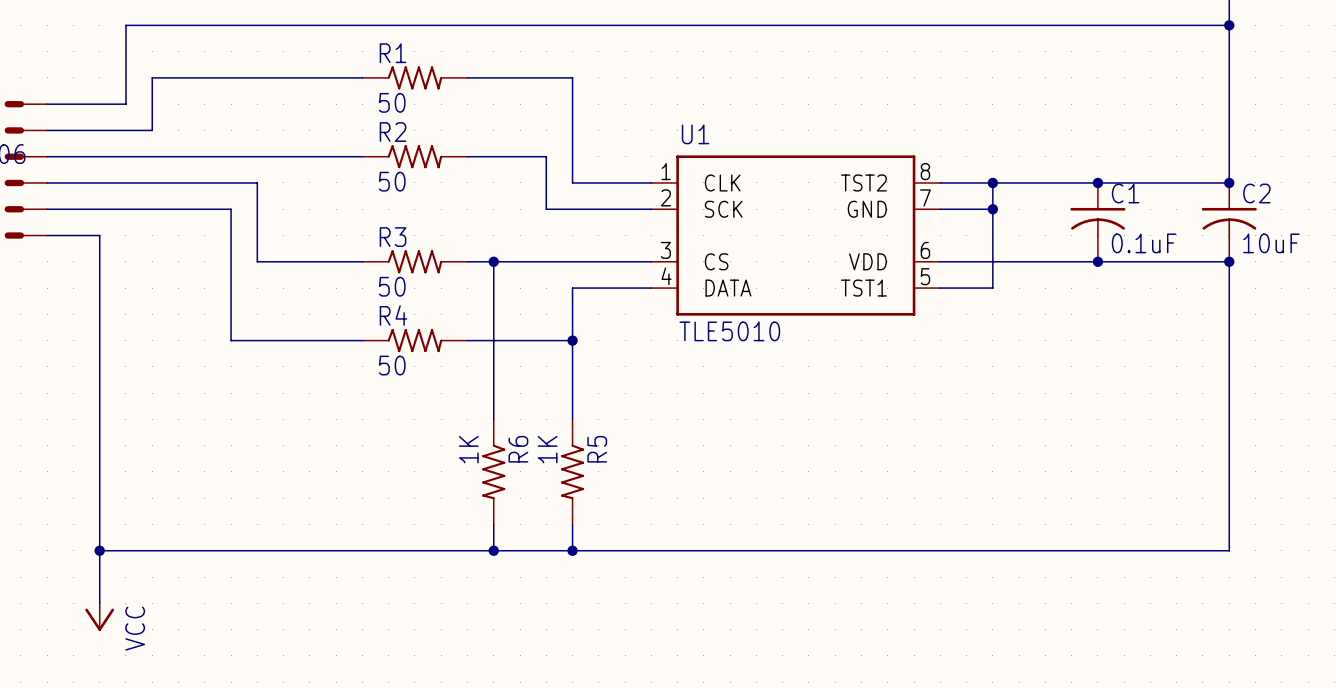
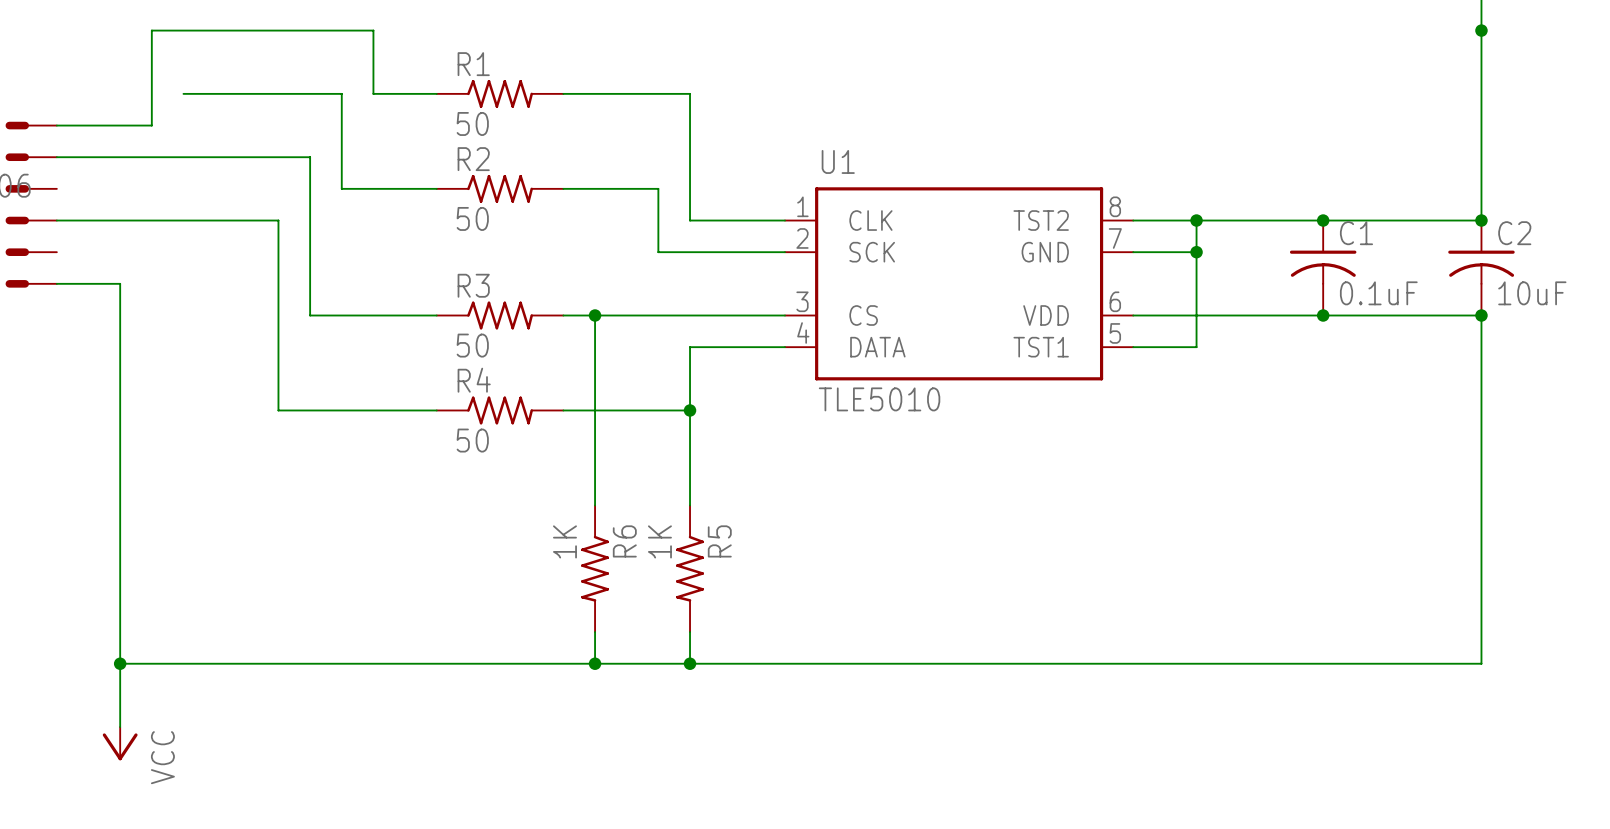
wire: (309, 25) (1229, 25) -> none
wire: (152, 77) (152, 130) -> (310, 220) (310, 157) (183, 157)
wire: (283, 77) (309, 77) -> (373, 30) (373, 93)
wire: (47, 156) (283, 156) -> (341, 93) (341, 188)
wire: (231, 182) (257, 182) -> (278, 220) (278, 252)
wire: (47, 209) (231, 209) -> none

